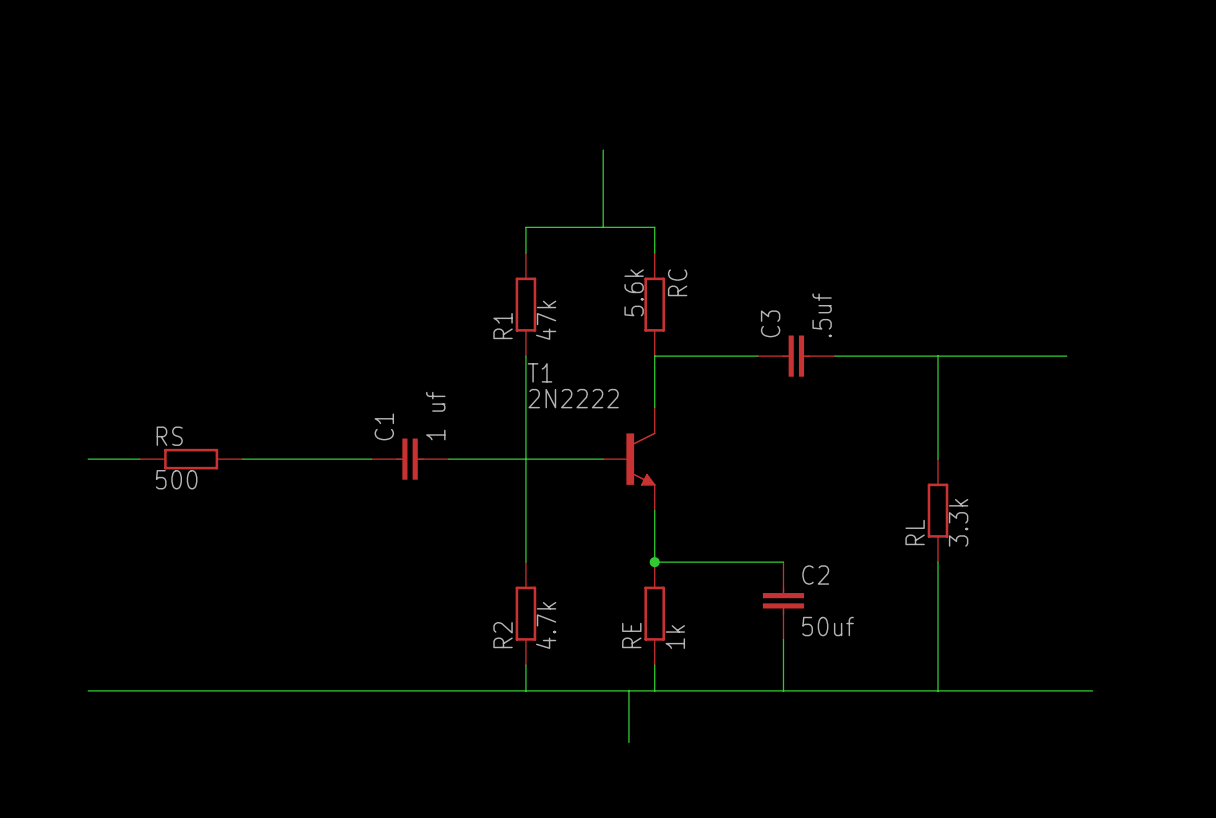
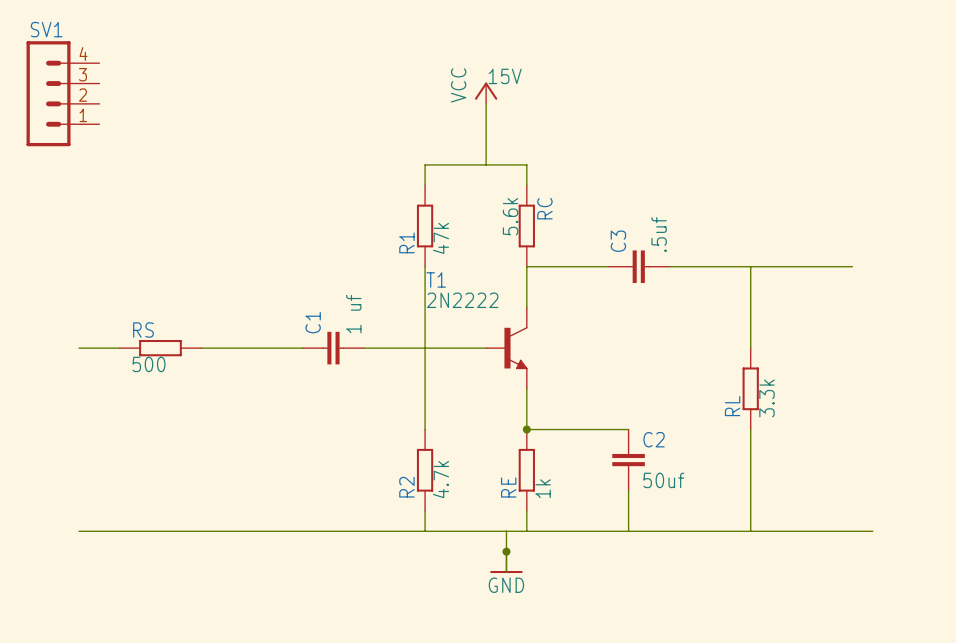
power symbol: none -> VCC (486, 93)
SV1: none -> (62, 93)
junction: none -> (506, 551)
power symbol: none -> GND (506, 562)

